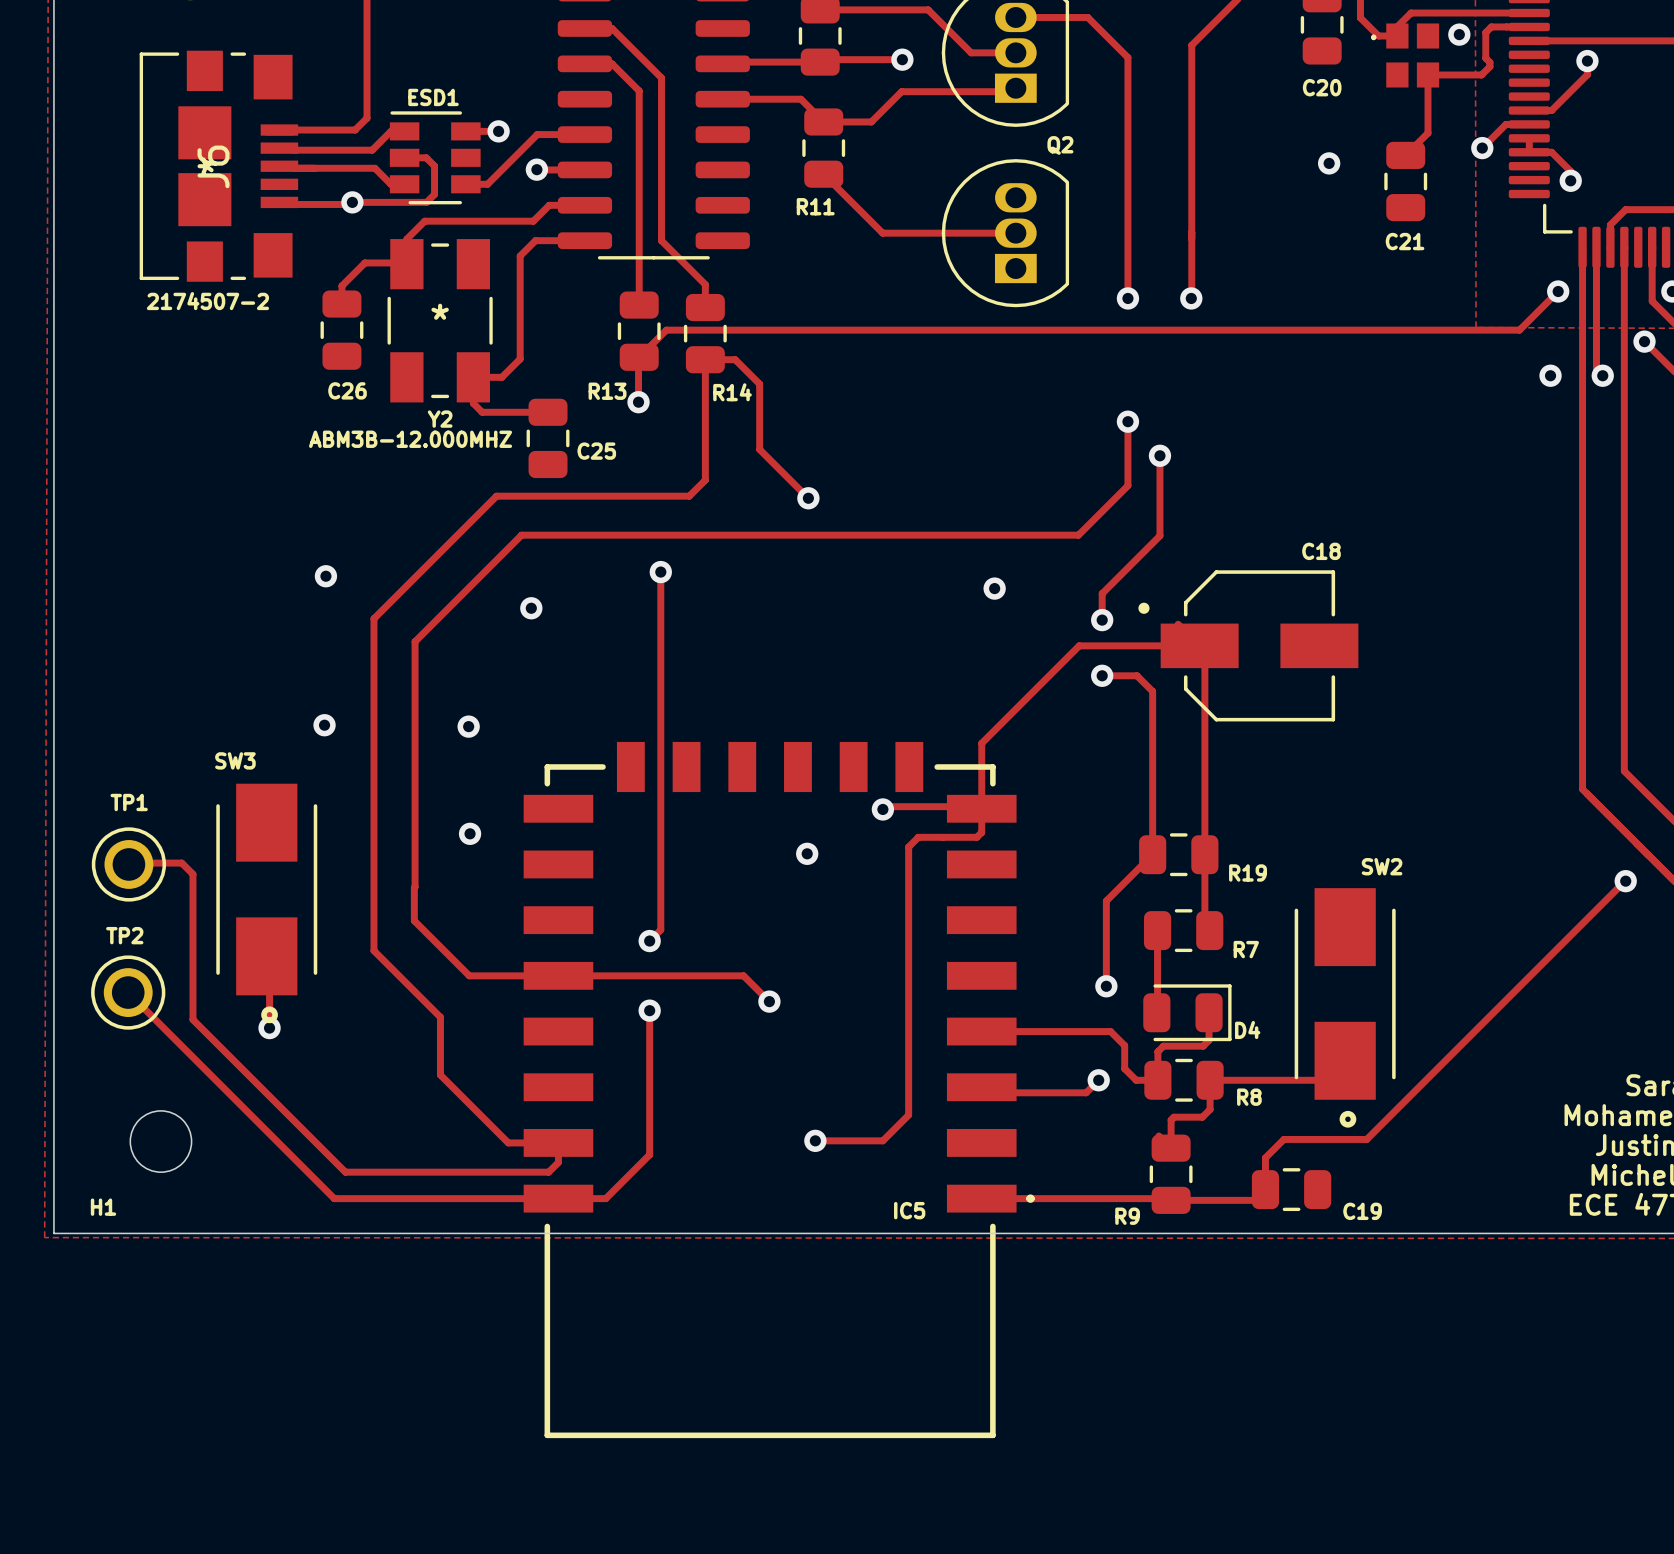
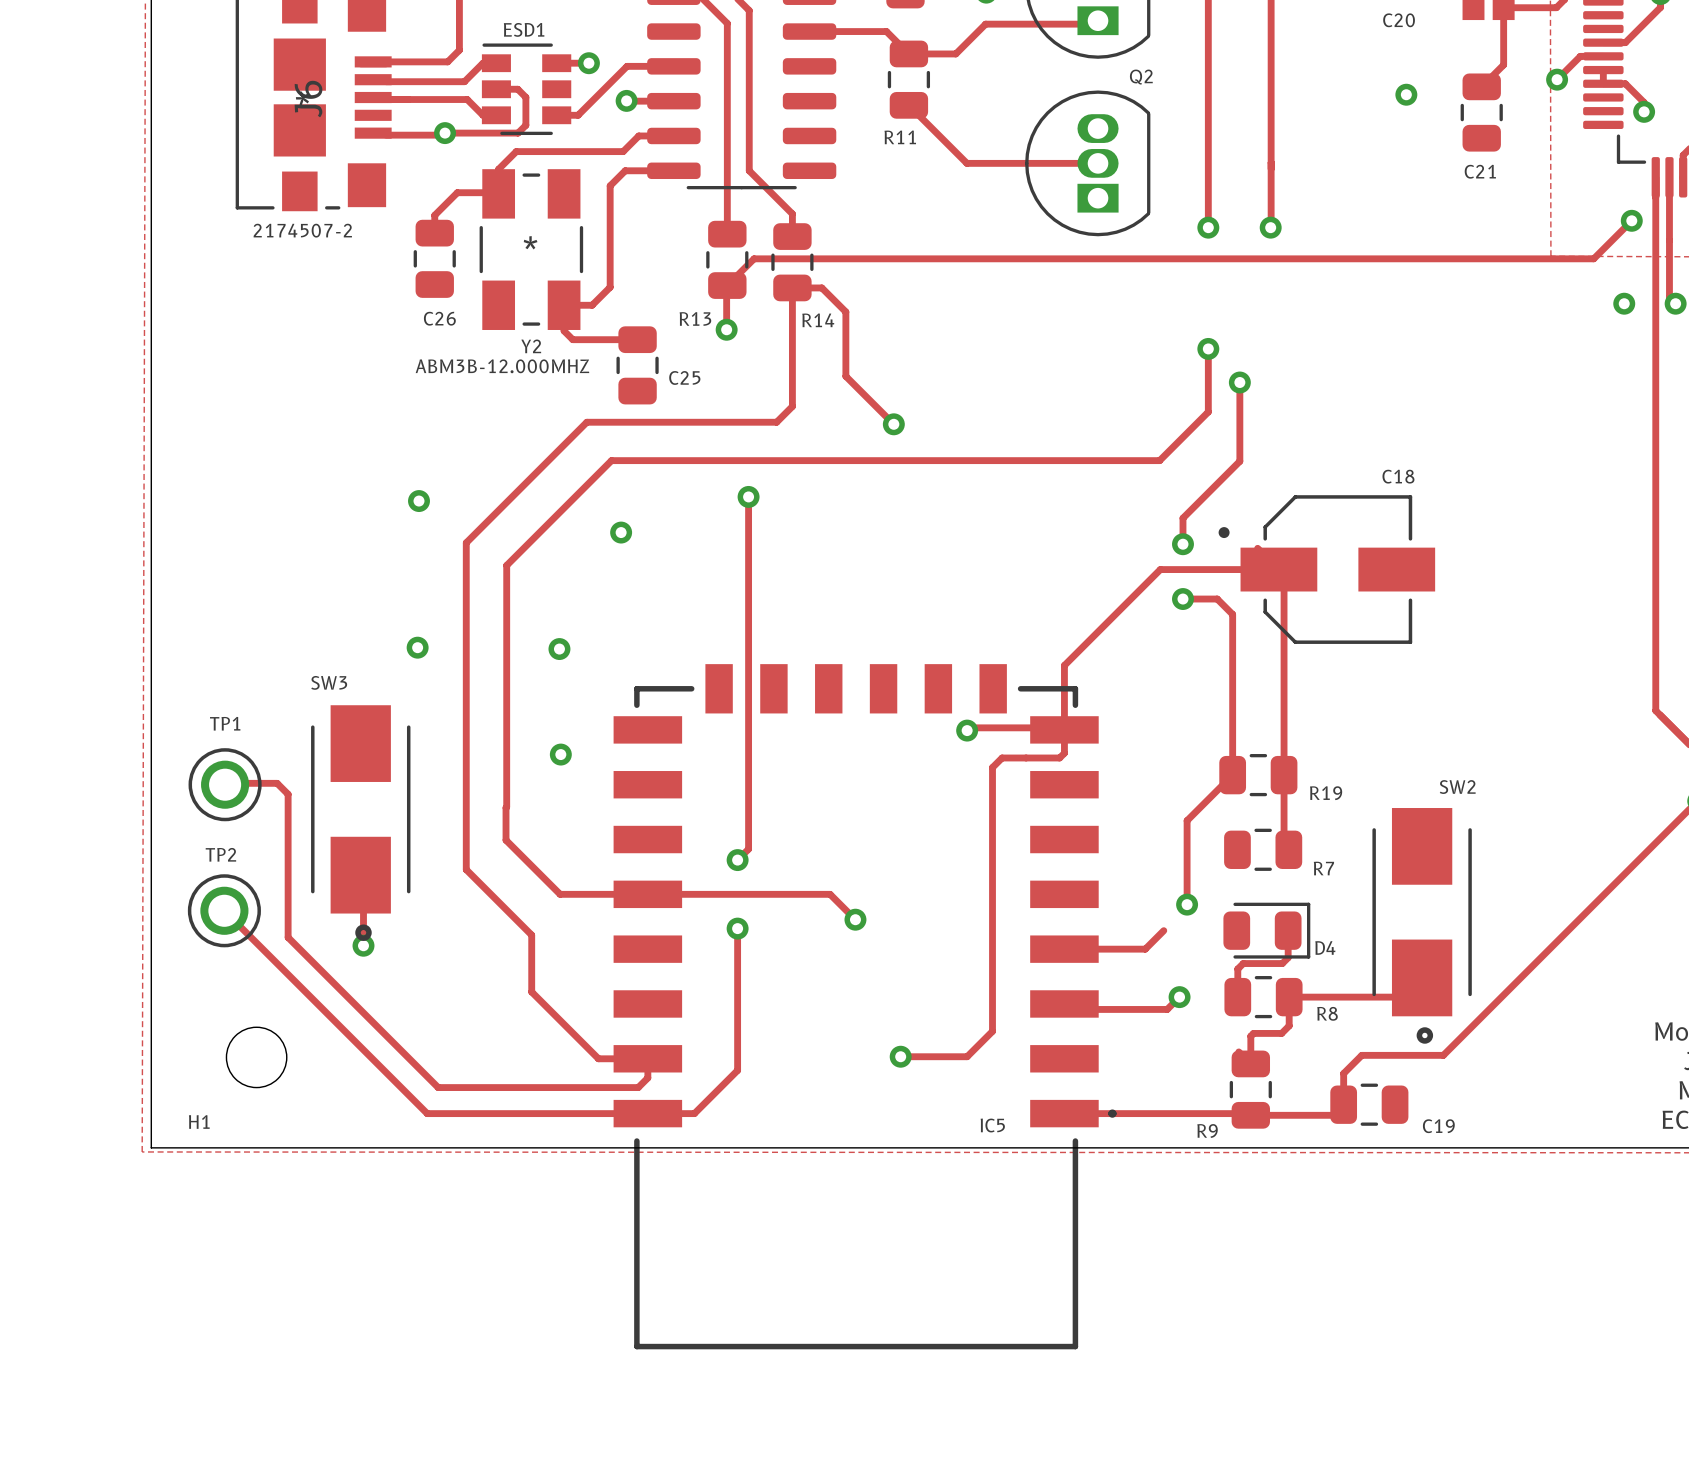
via: (994, 588) -> none
via: (807, 853) -> none
track: (1157, 930) (1156, 1012) -> none
track: (1063, 1031) (1110, 1031) (1124, 1045) (1124, 1068) (1136, 1080) (1157, 1080) -> (1145, 949) (1163, 930)

